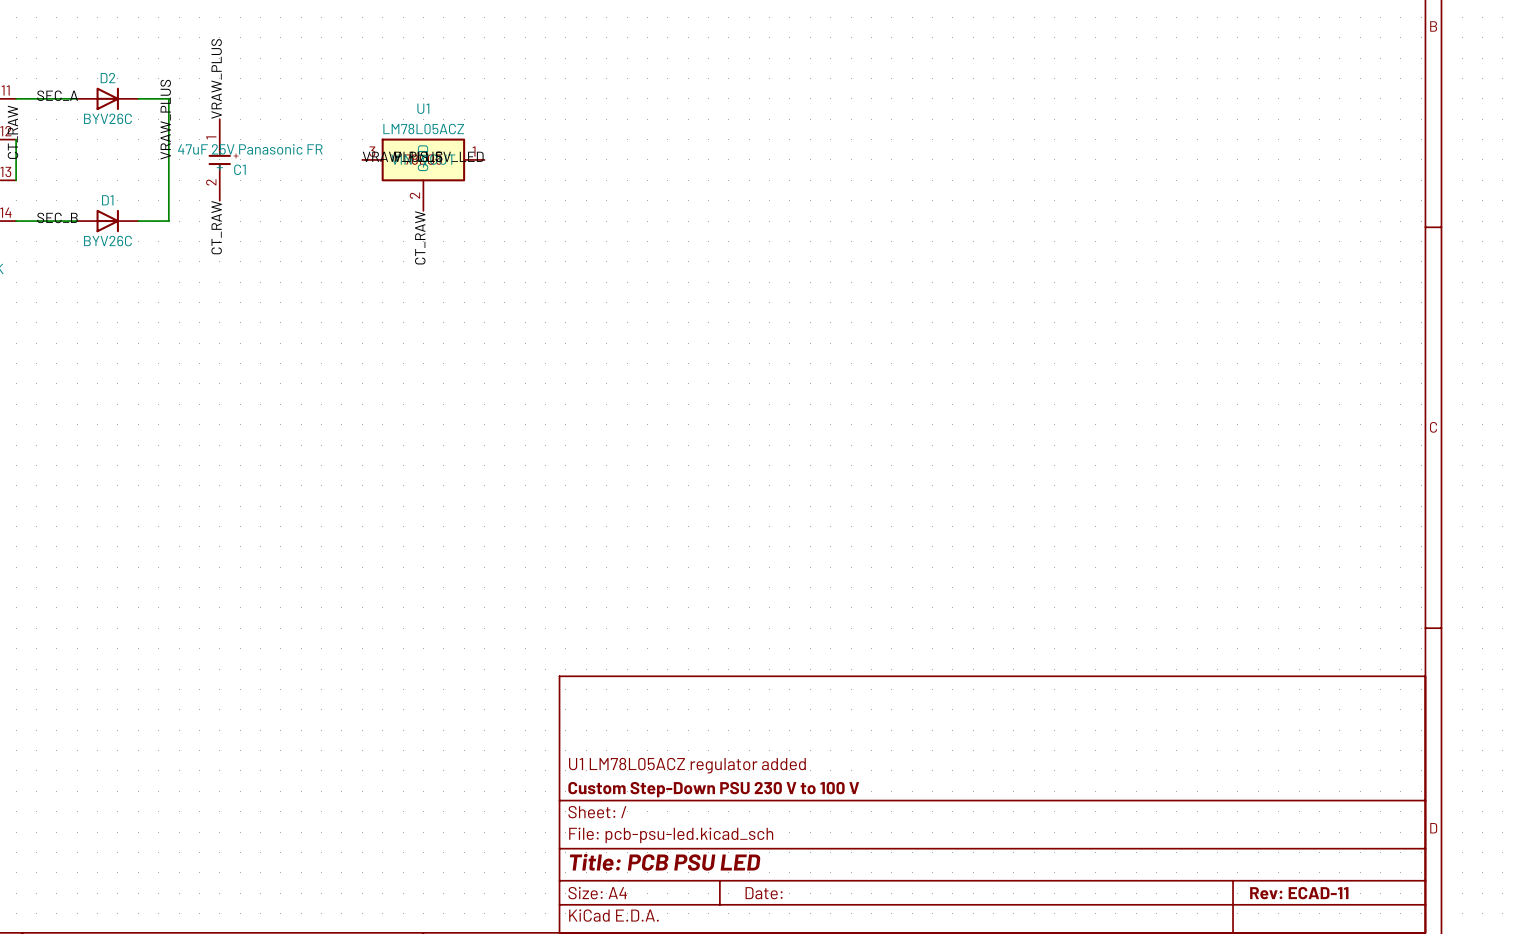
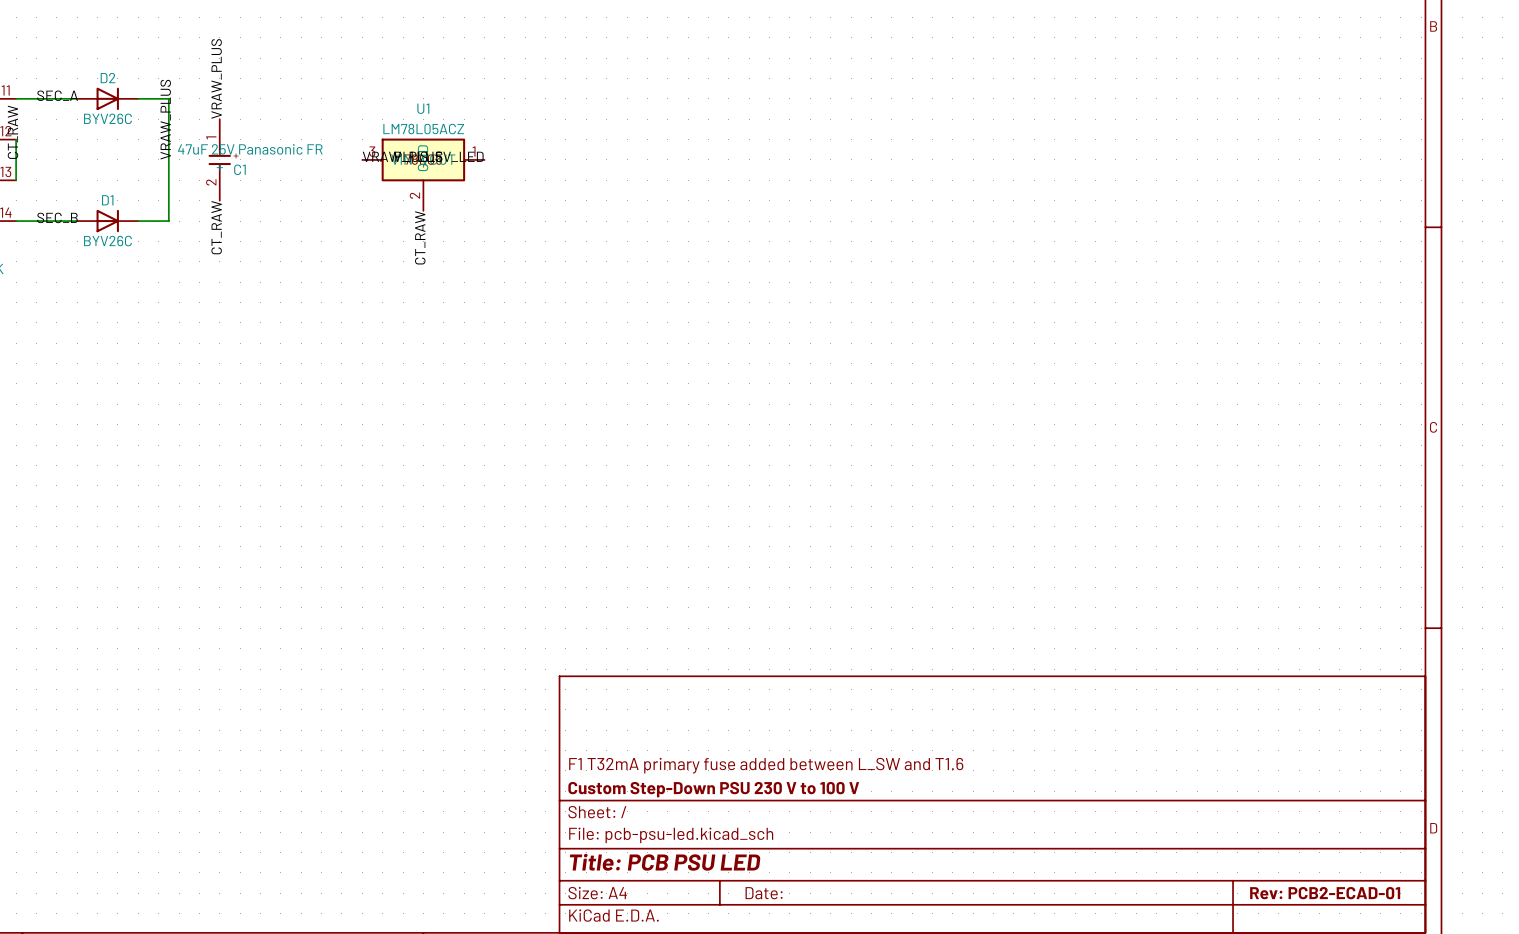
title block: U1 LM78L05ACZ regulator added (687, 765) -> F1 T32mA primary fuse added between L_SW and T1.6 (766, 765)
title block: Rev: ECAD-11 (1299, 893) -> Rev: PCB2-ECAD-01 (1325, 893)

